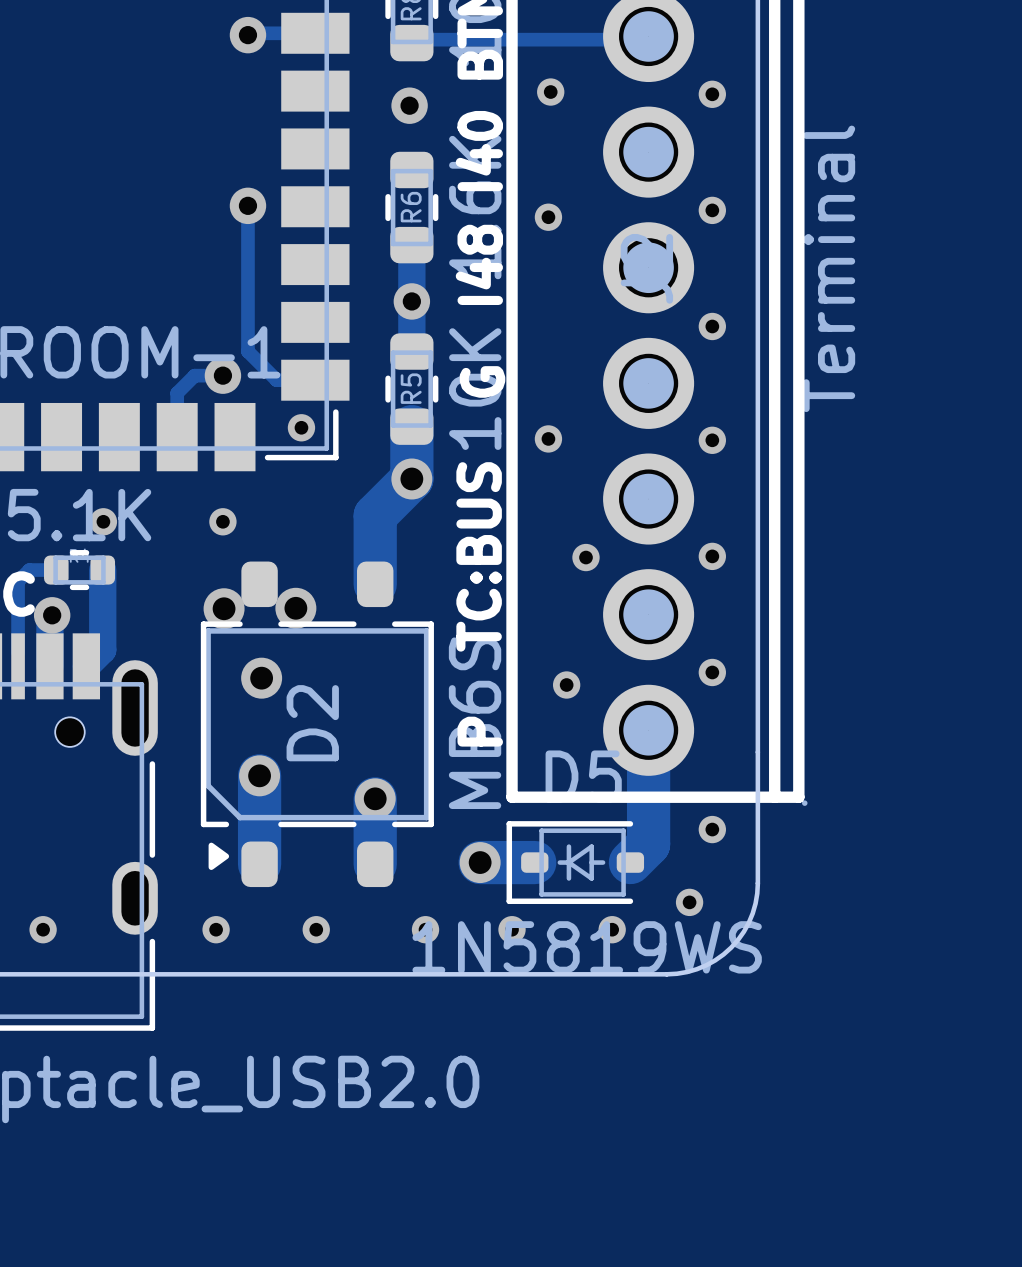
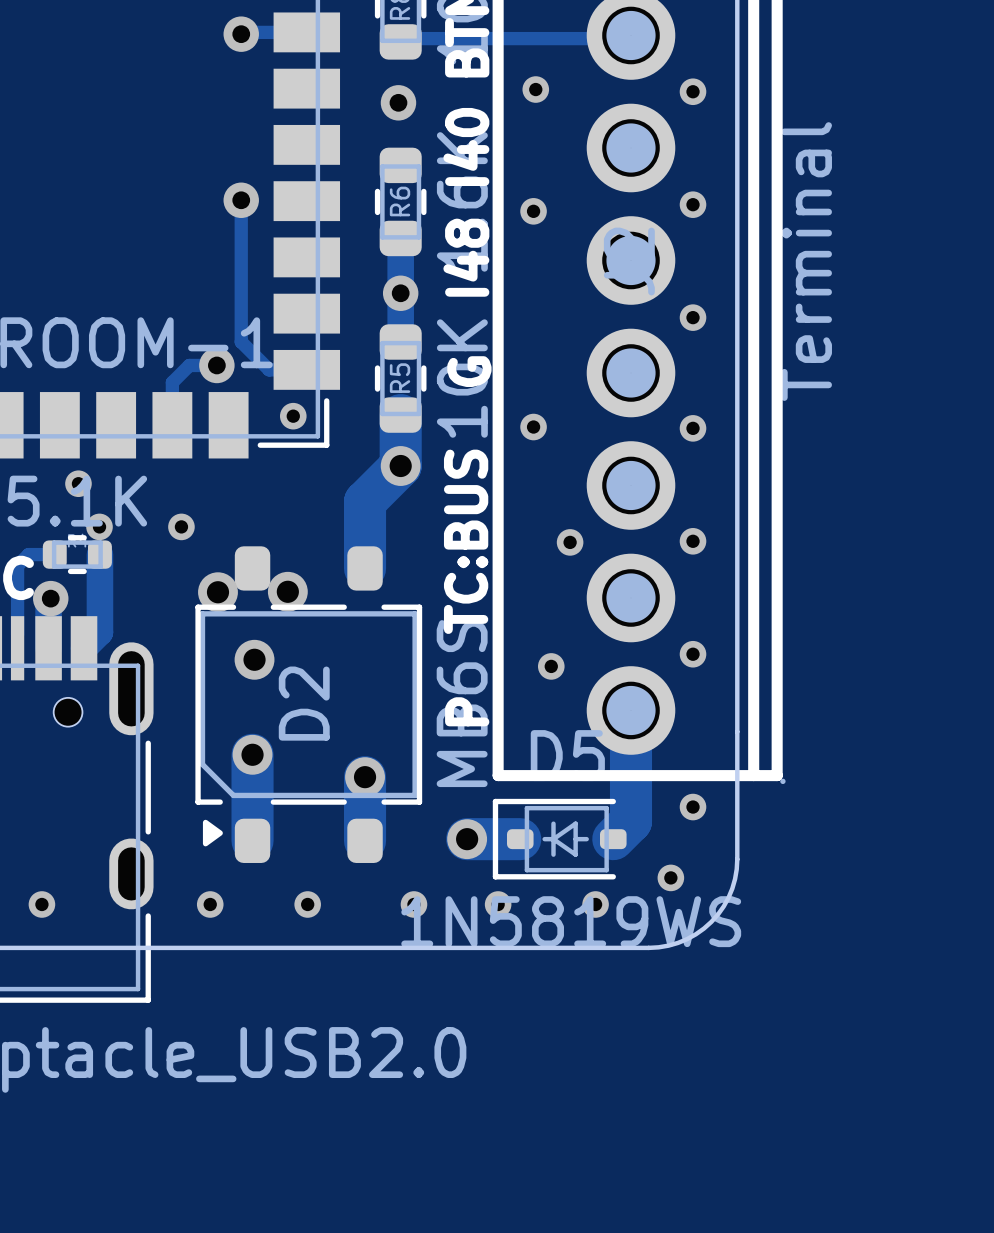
via: none -> (78, 483)
via: (103, 521) -> none
via position: (222, 521) -> (181, 526)
via: none -> (99, 526)

